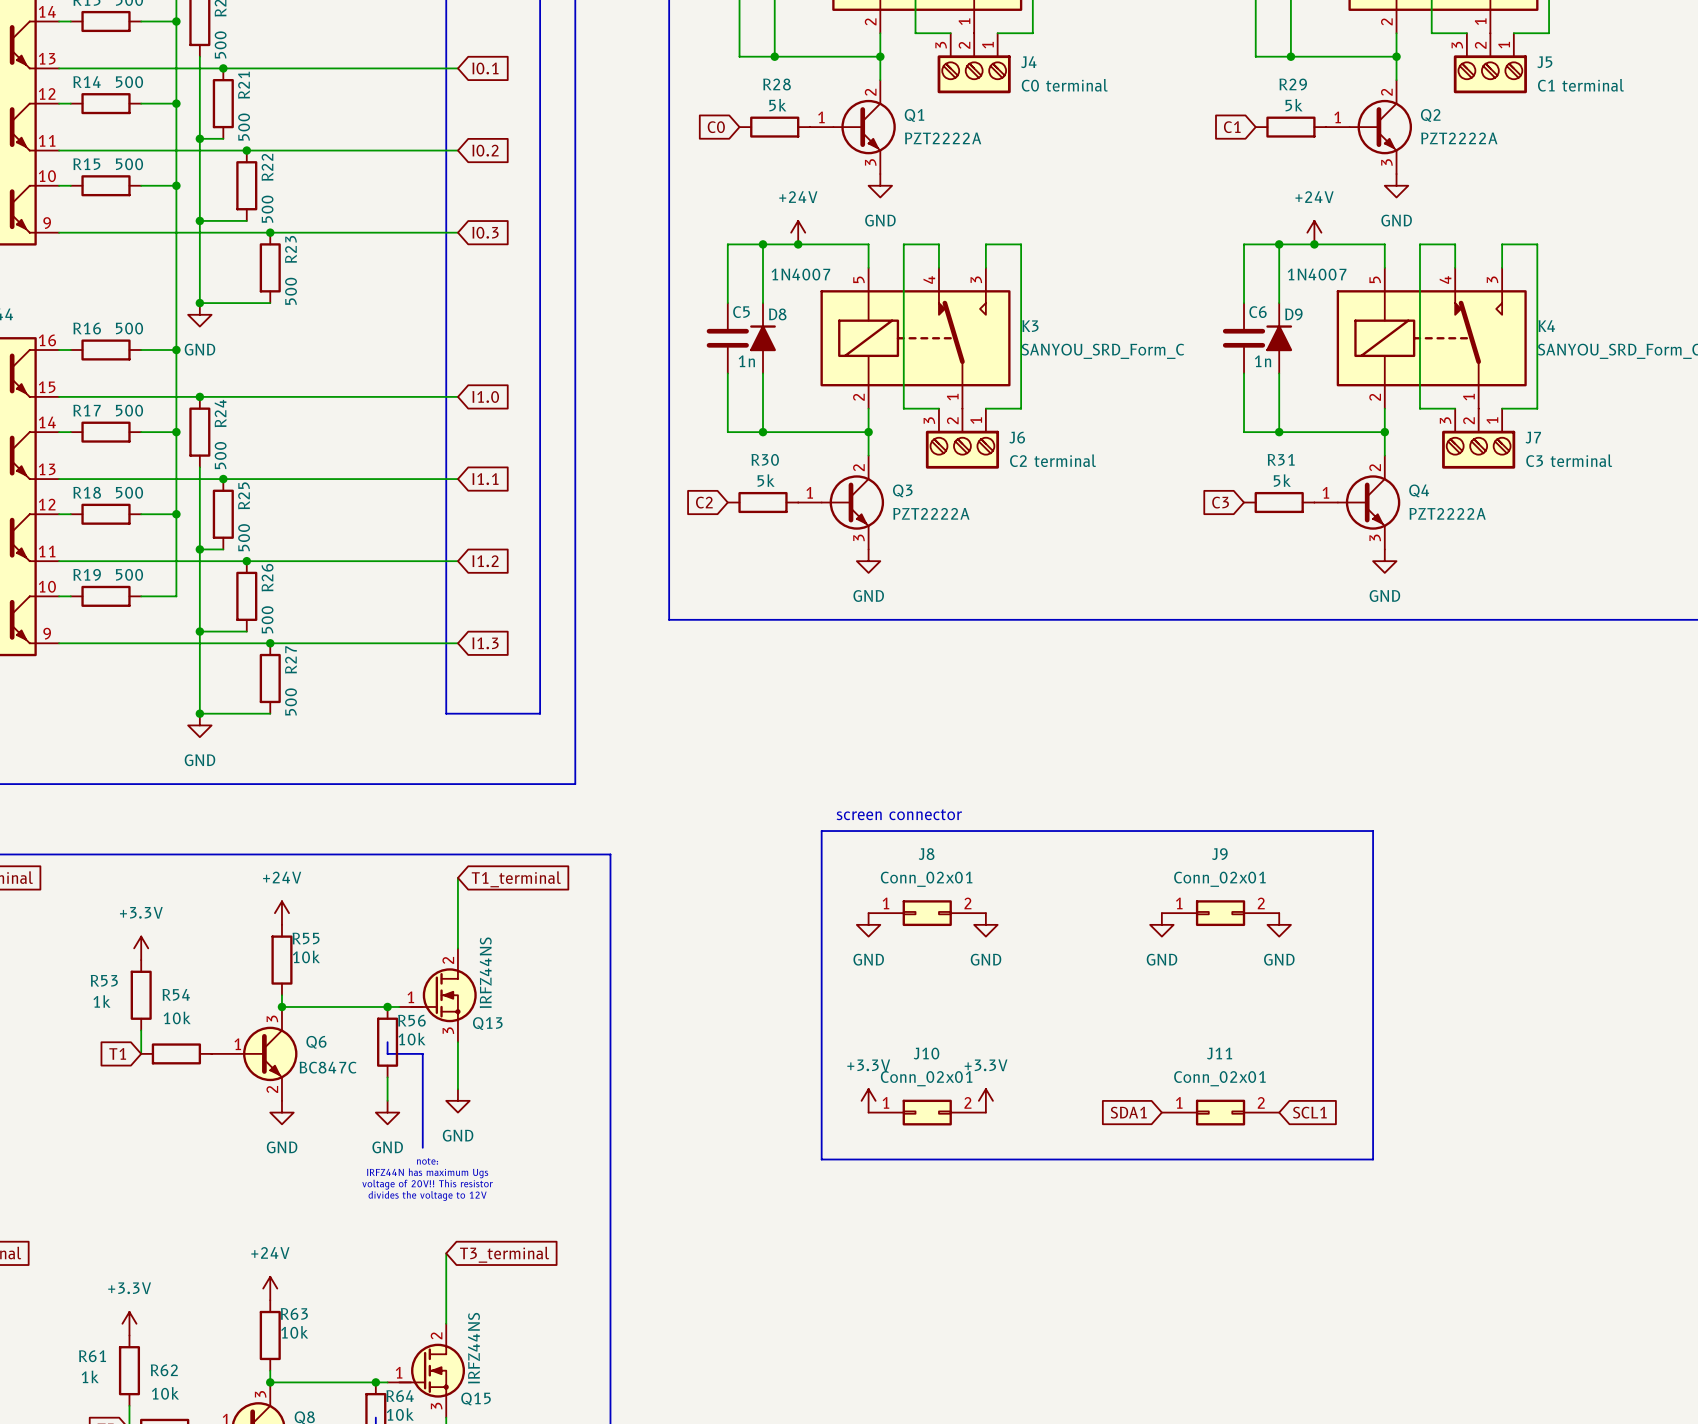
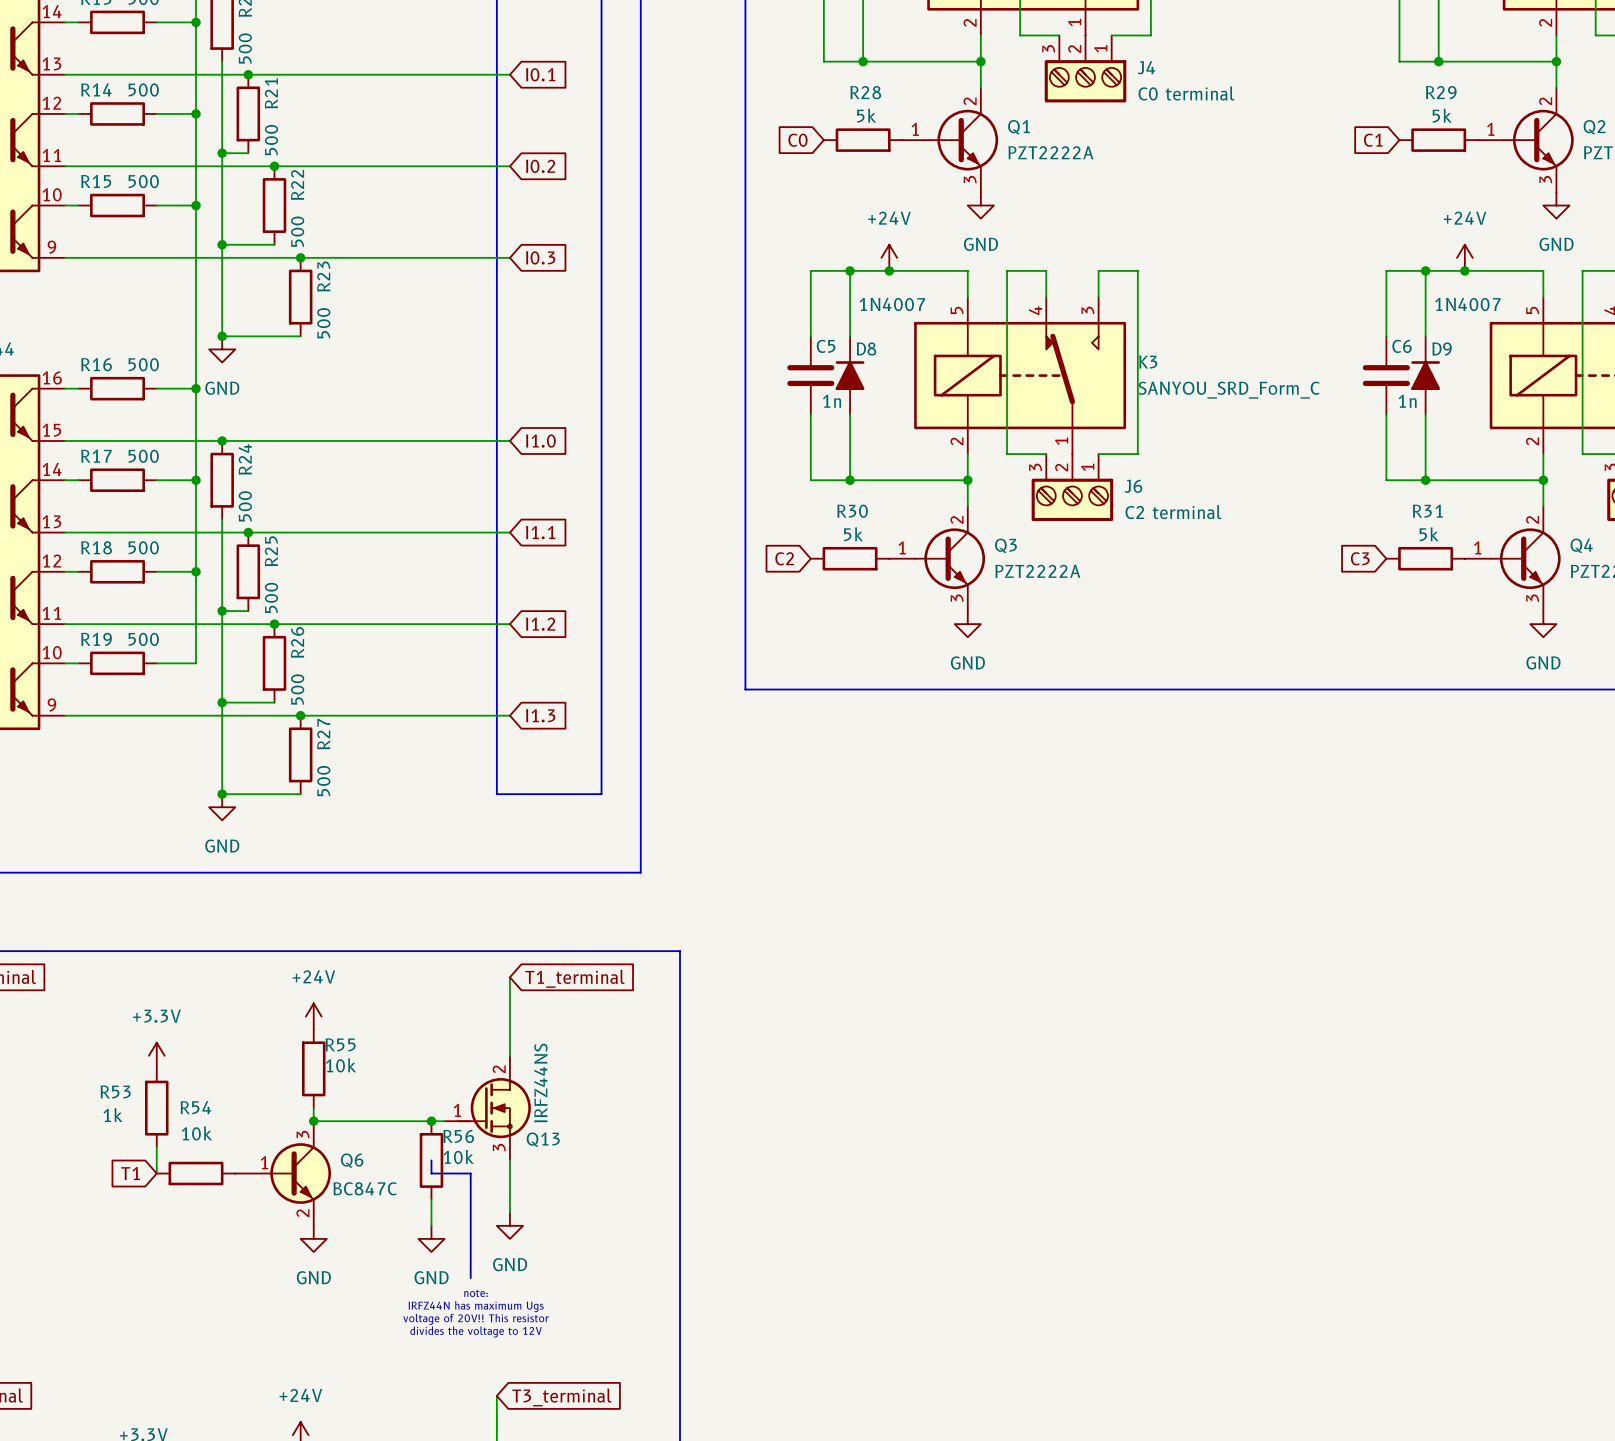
text: screen connector (899, 814) -> none
line: (821, 831) (1373, 831) (1373, 1159) (821, 1159) (821, 831) -> none
J8: Conn_02x01 (927, 913) -> none
J9: Conn_02x01 (1220, 913) -> none
power symbol: GND (868, 924) -> none
power symbol: GND (985, 924) -> none
power symbol: GND (1161, 924) -> none
power symbol: GND (1279, 924) -> none
power symbol: +3.3V (868, 1100) -> none
power symbol: +3.3V (985, 1100) -> none
J10: Conn_02x01 (927, 1112) -> none
global label: SDA1 (1128, 1112) -> none
J11: Conn_02x01 (1220, 1112) -> none
global label: SCL1 (1309, 1112) -> none

